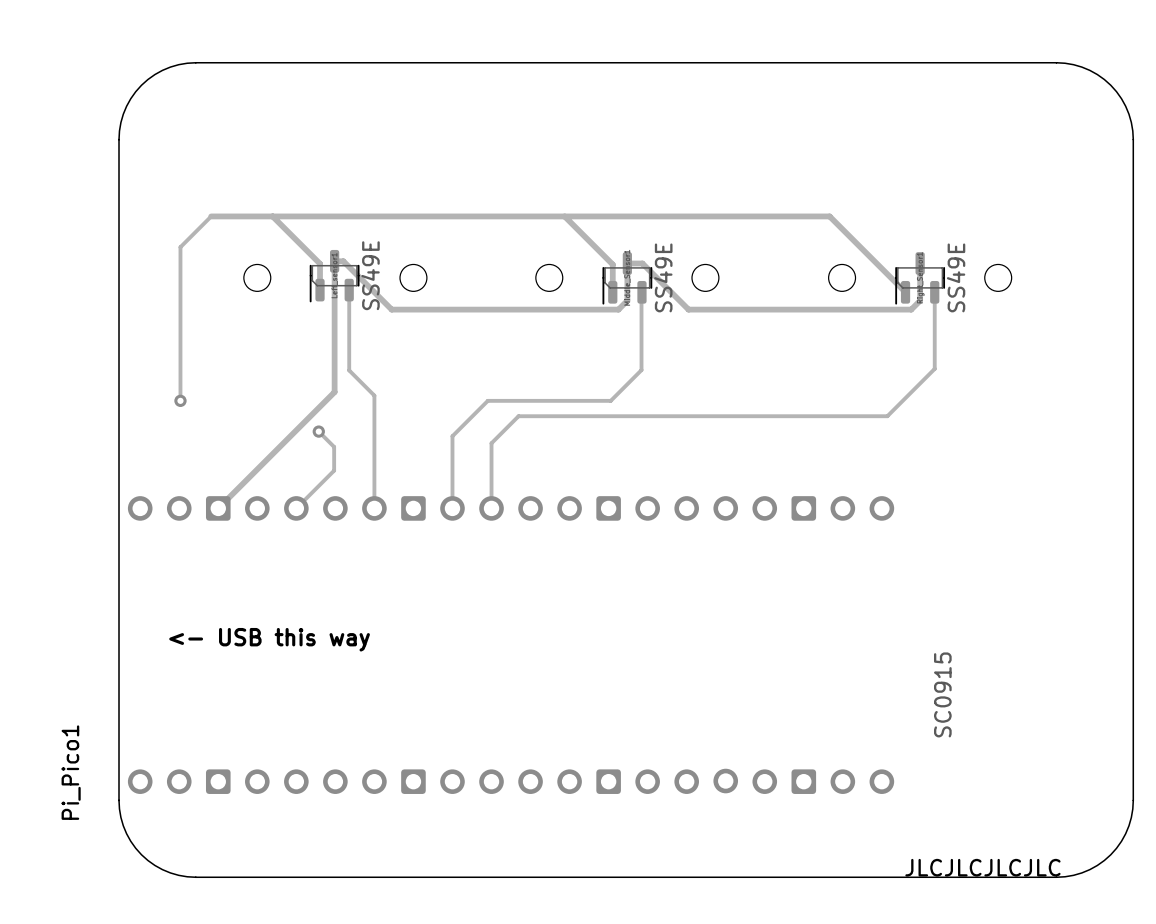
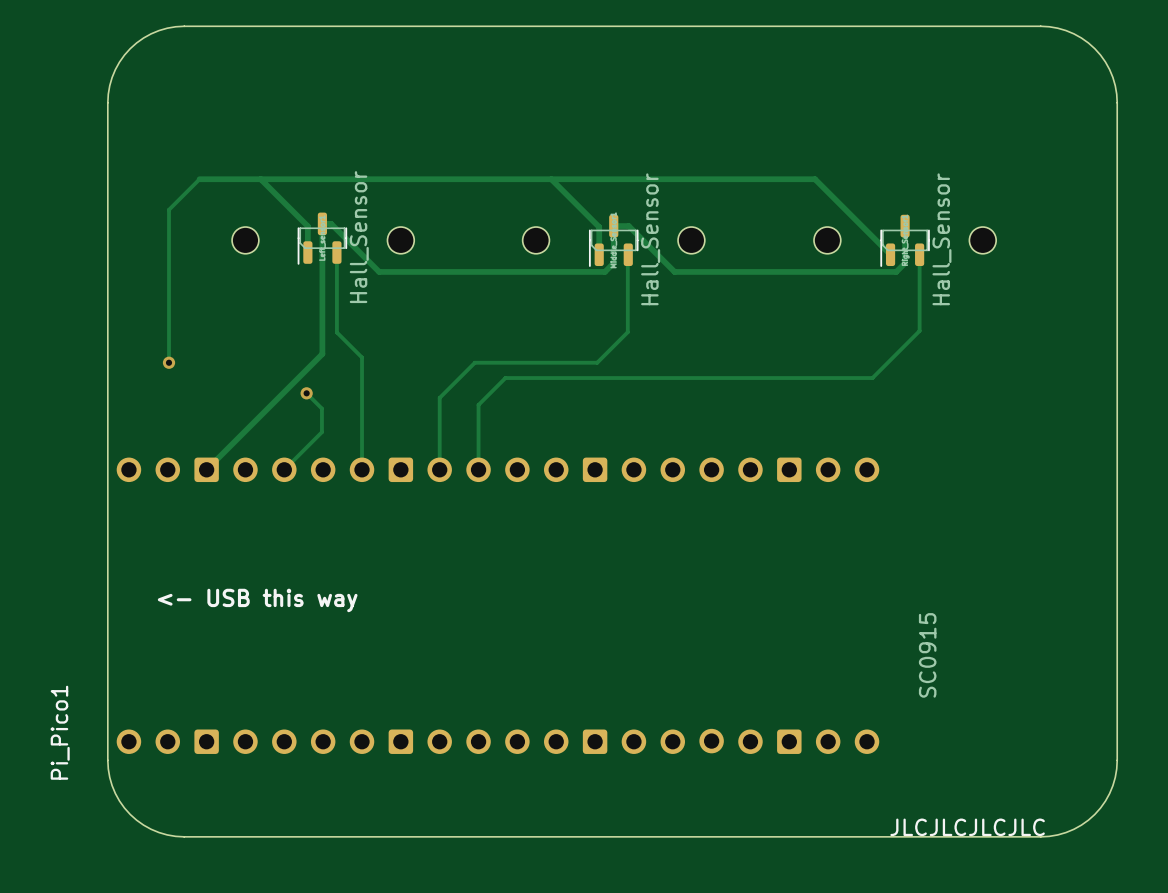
part value: SS49E (370, 275) -> Hall_Sensor (359, 237)
part value: SS49E (663, 277) -> Hall_Sensor (650, 239)
part value: SS49E (956, 277) -> Hall_Sensor (941, 239)

